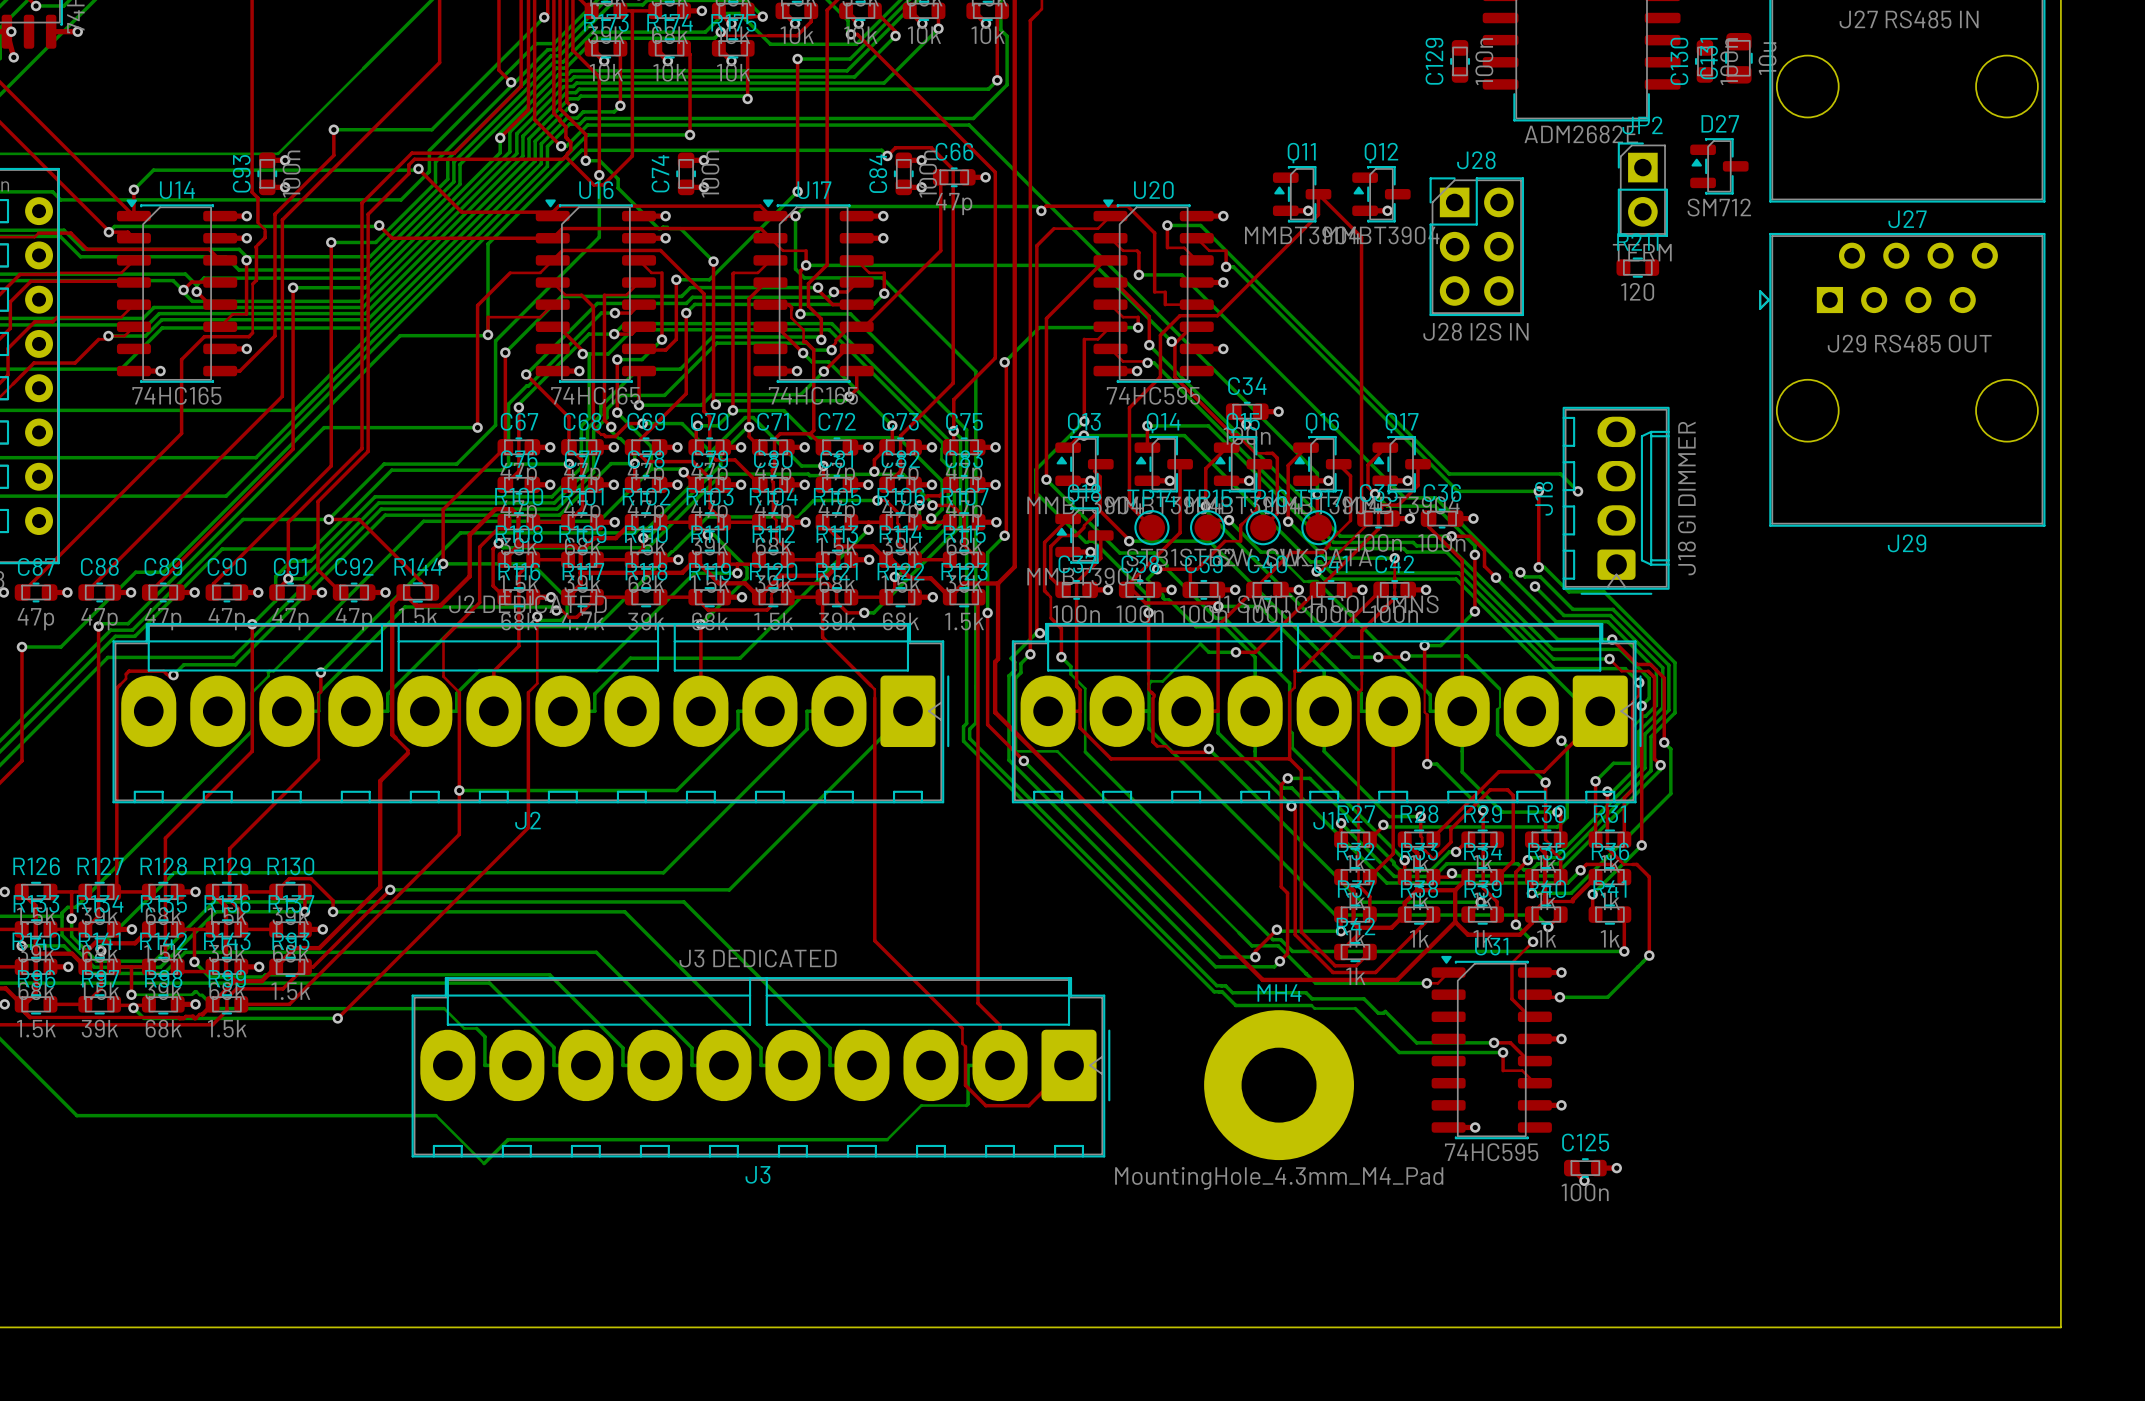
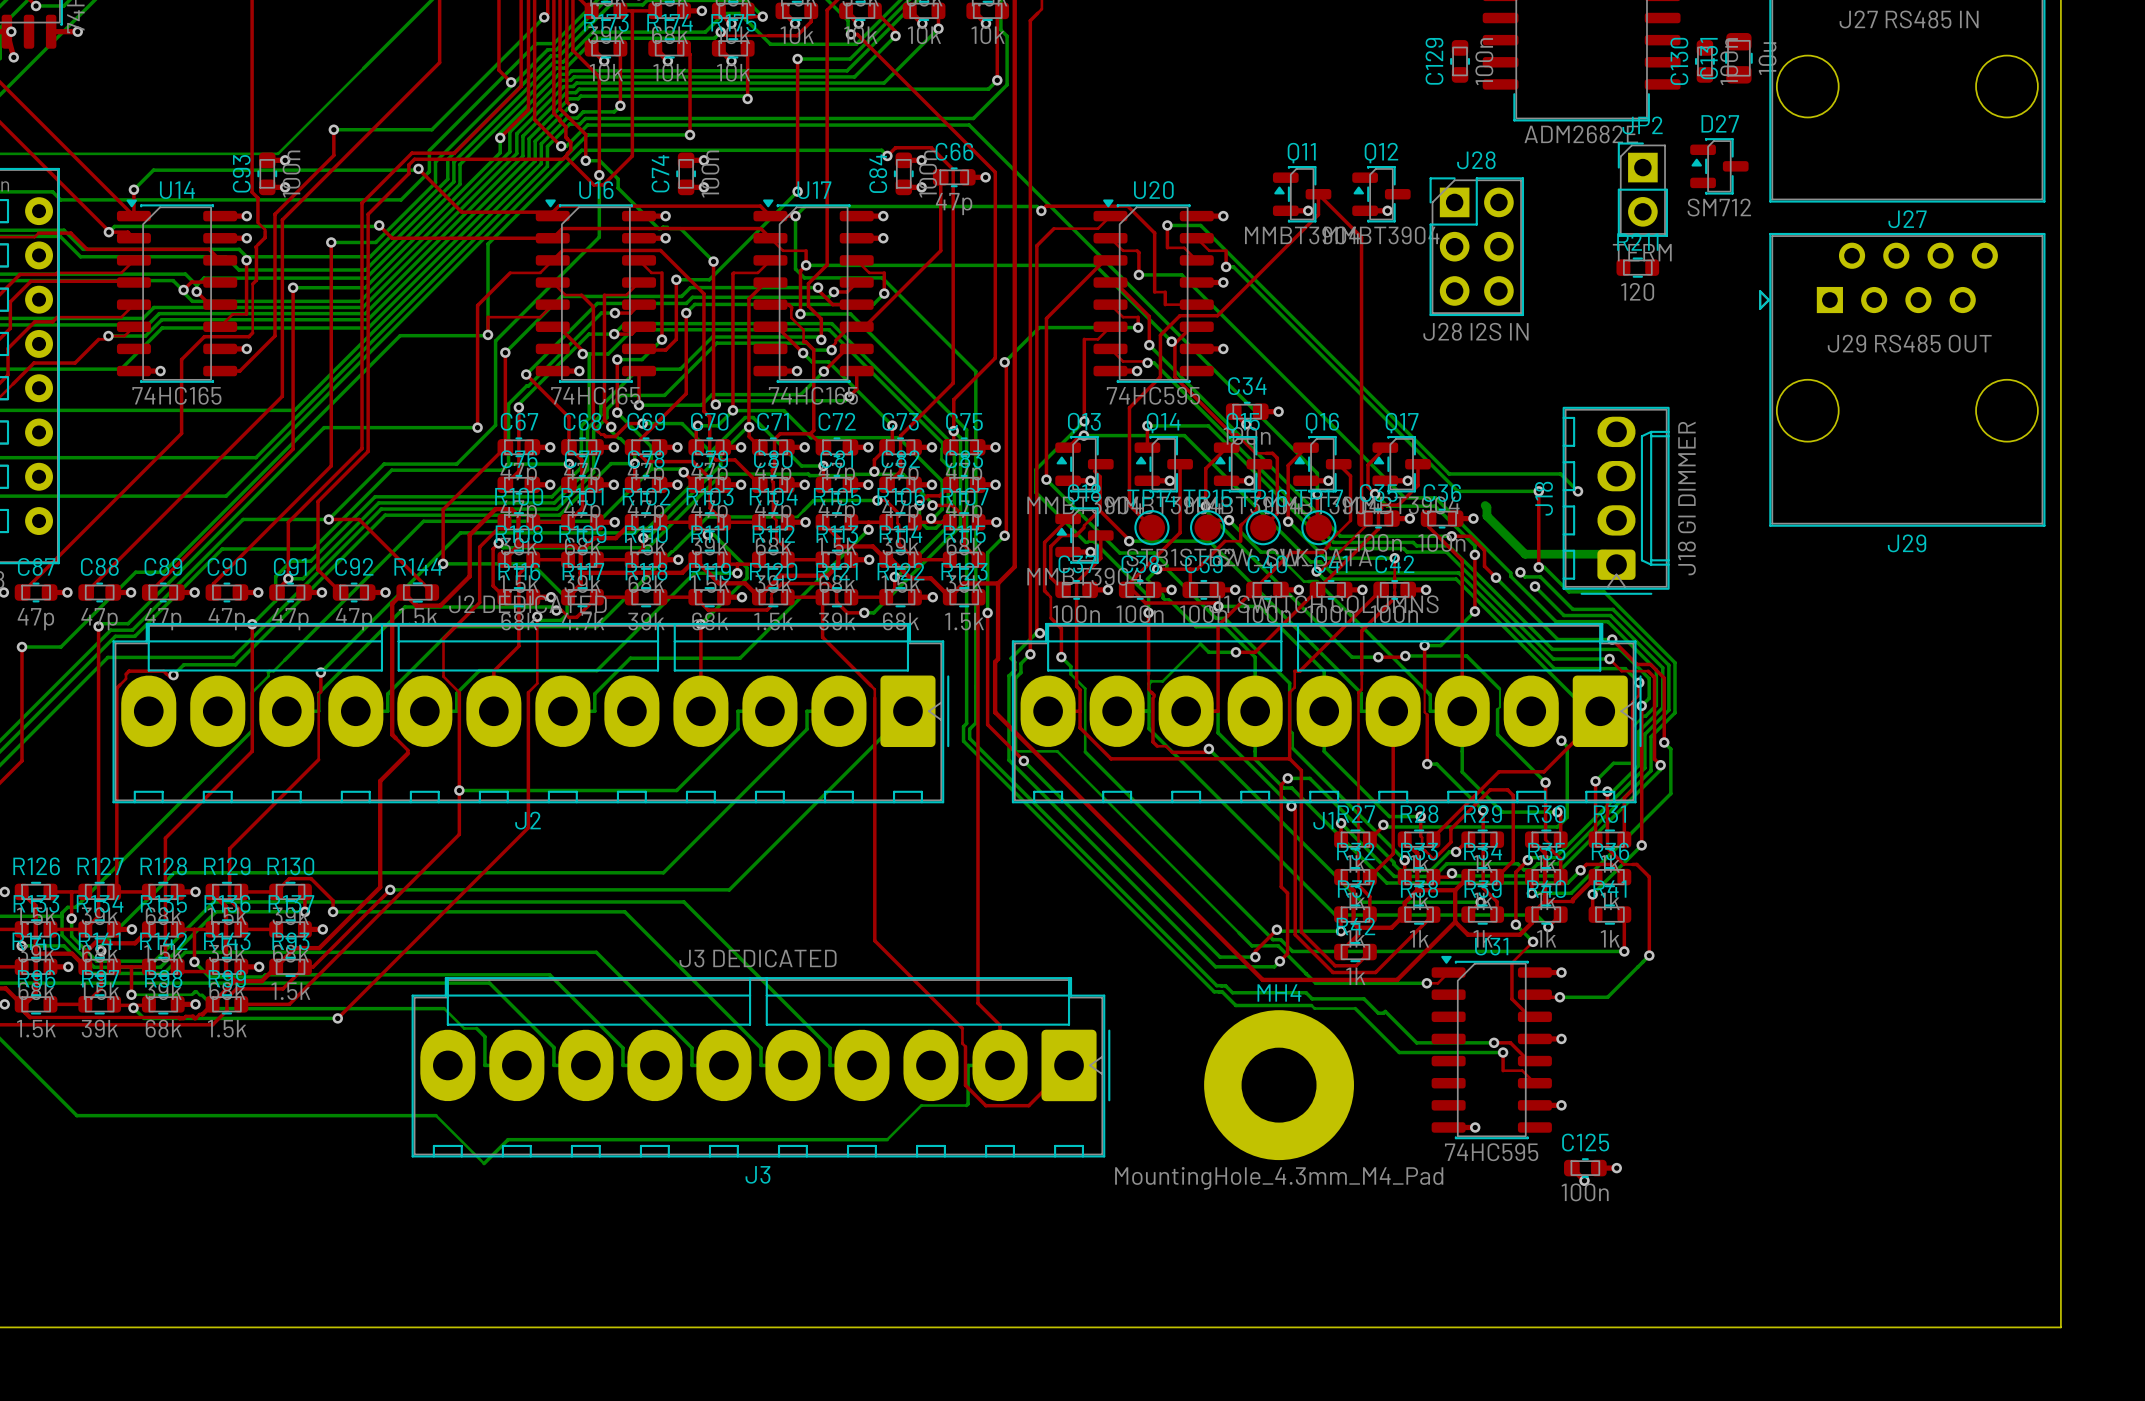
bottom track: none -> (1485, 505) (1486, 515) (1525, 554) (1605, 554)

